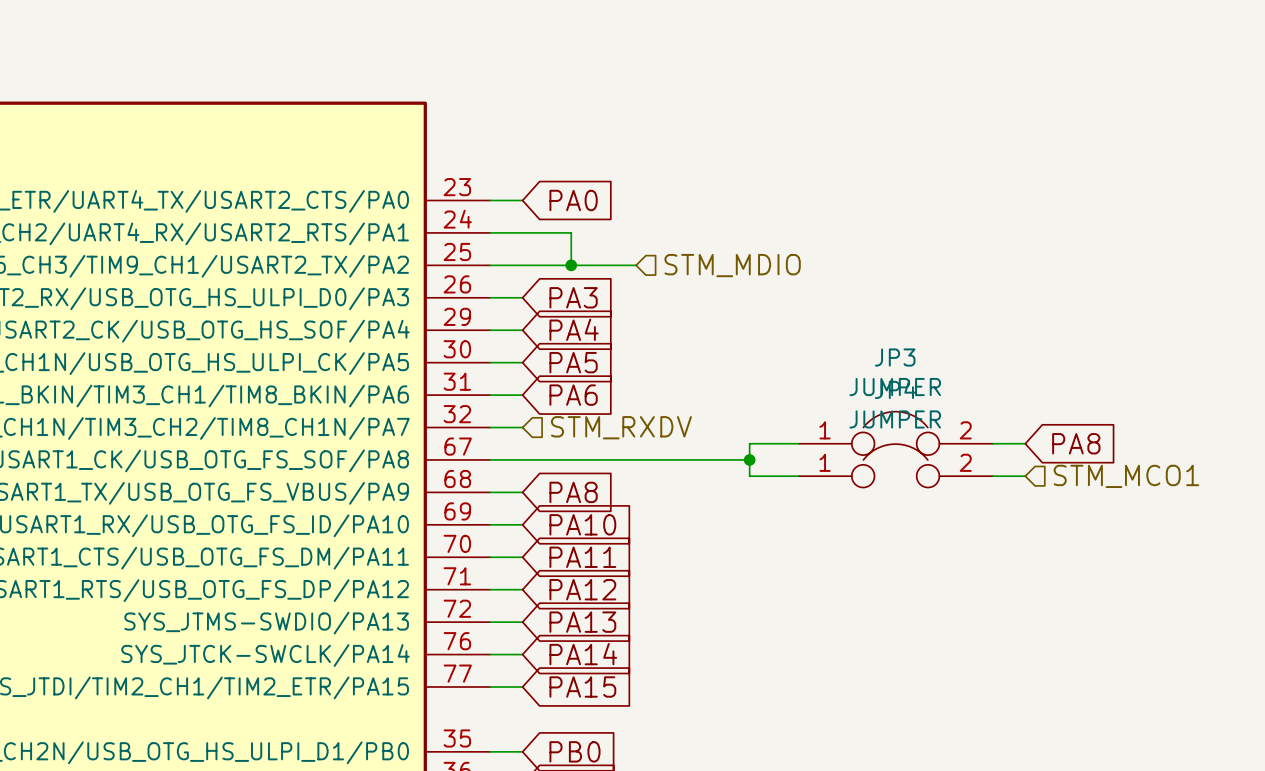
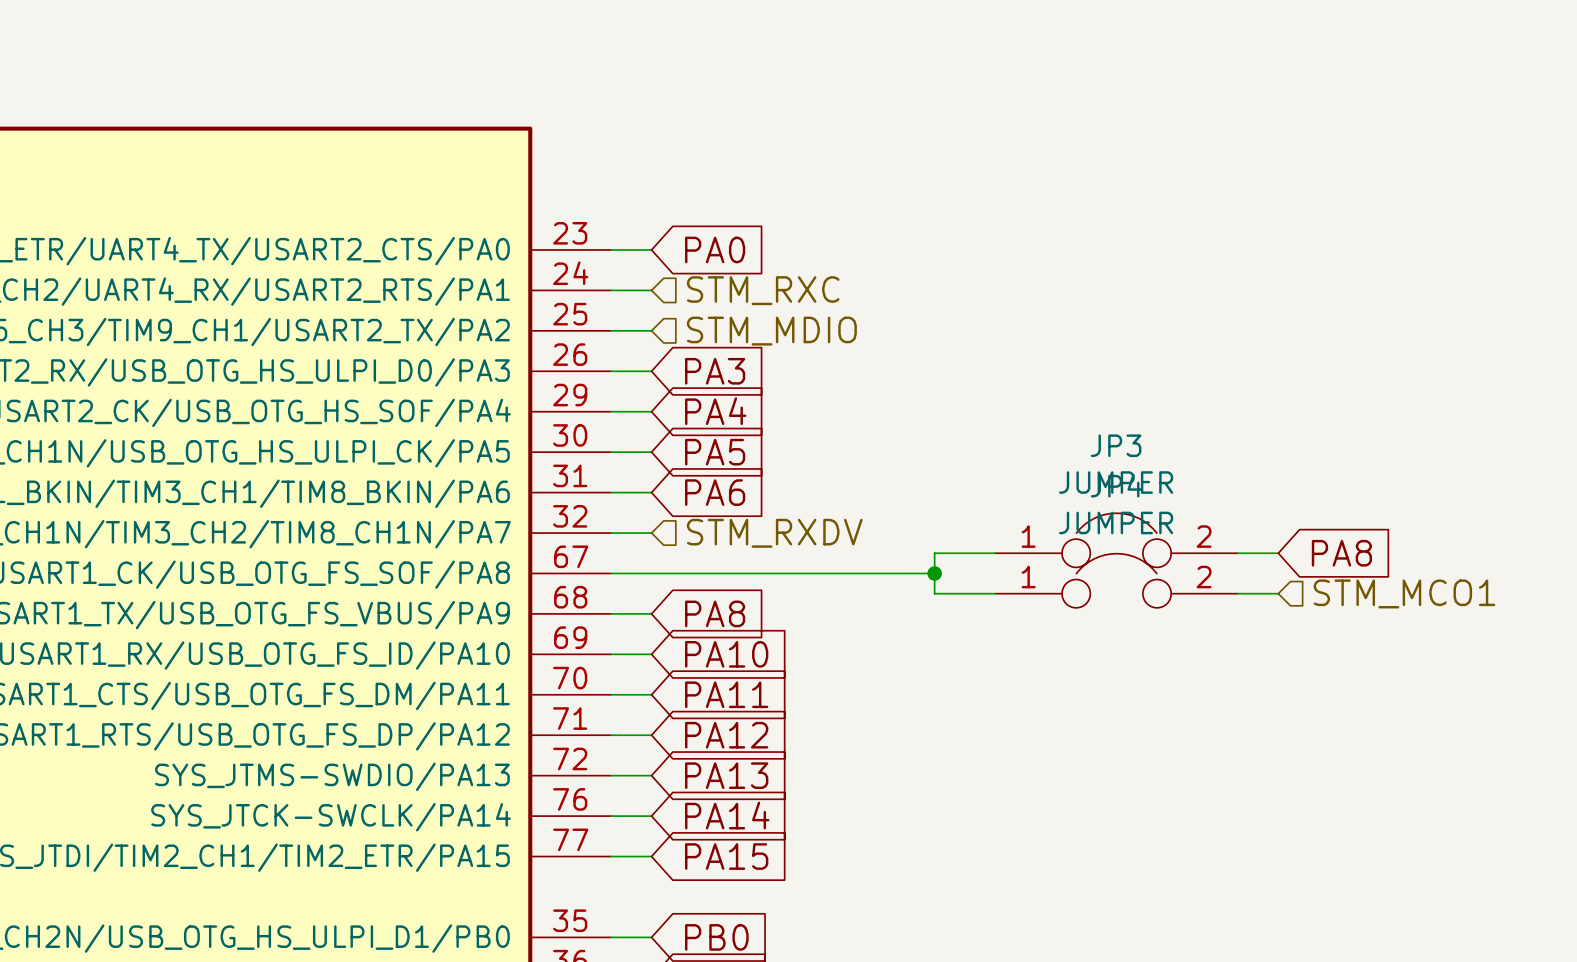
wire: (522, 232) (571, 232) (571, 265) -> none
hierarchical label: none -> STM_RXC (763, 290)
wire: (522, 265) (636, 265) -> none
junction: (571, 265) -> none
hierarchical label position: STM_MDIO (732, 265) -> STM_MDIO (771, 331)

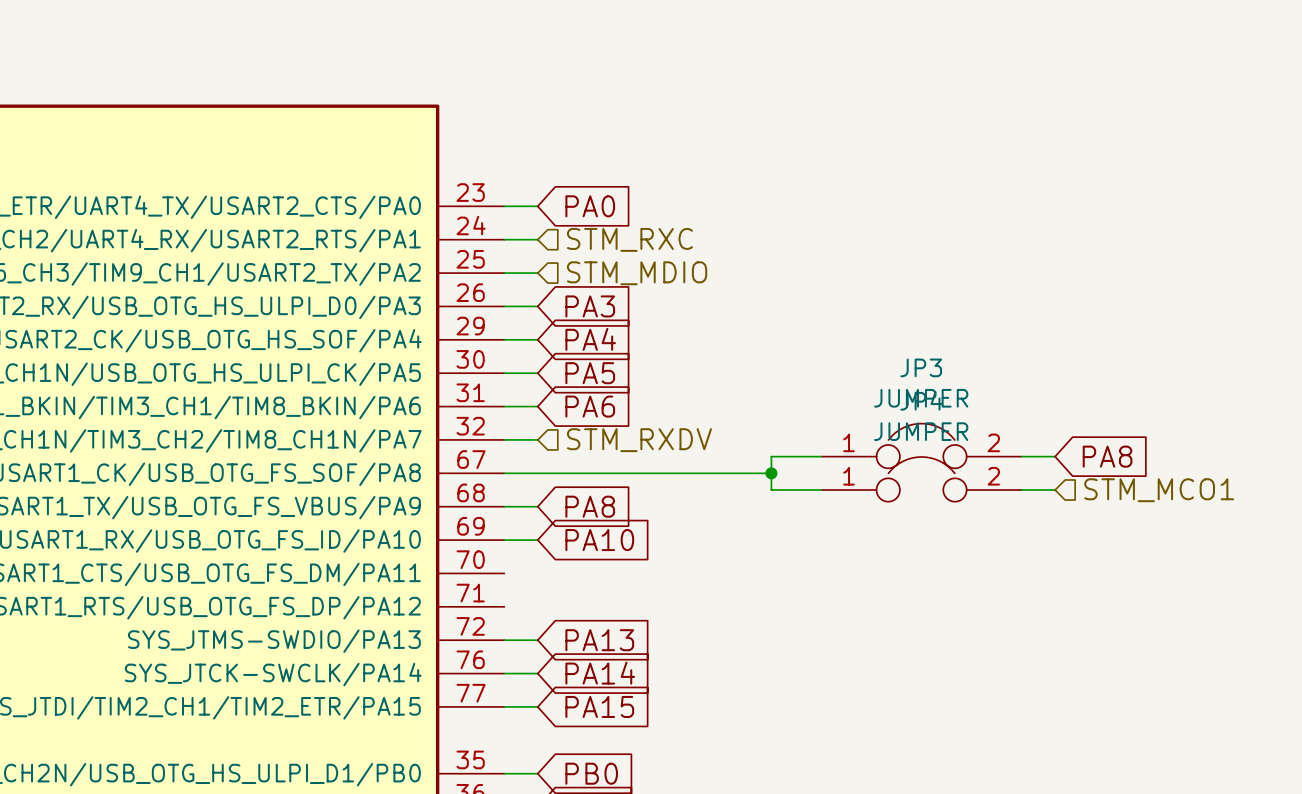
wire: (611, 694) (651, 694) -> none
global label: PA11 (726, 694) -> none
wire: (611, 735) (651, 735) -> none
global label: PA12 (726, 735) -> none

